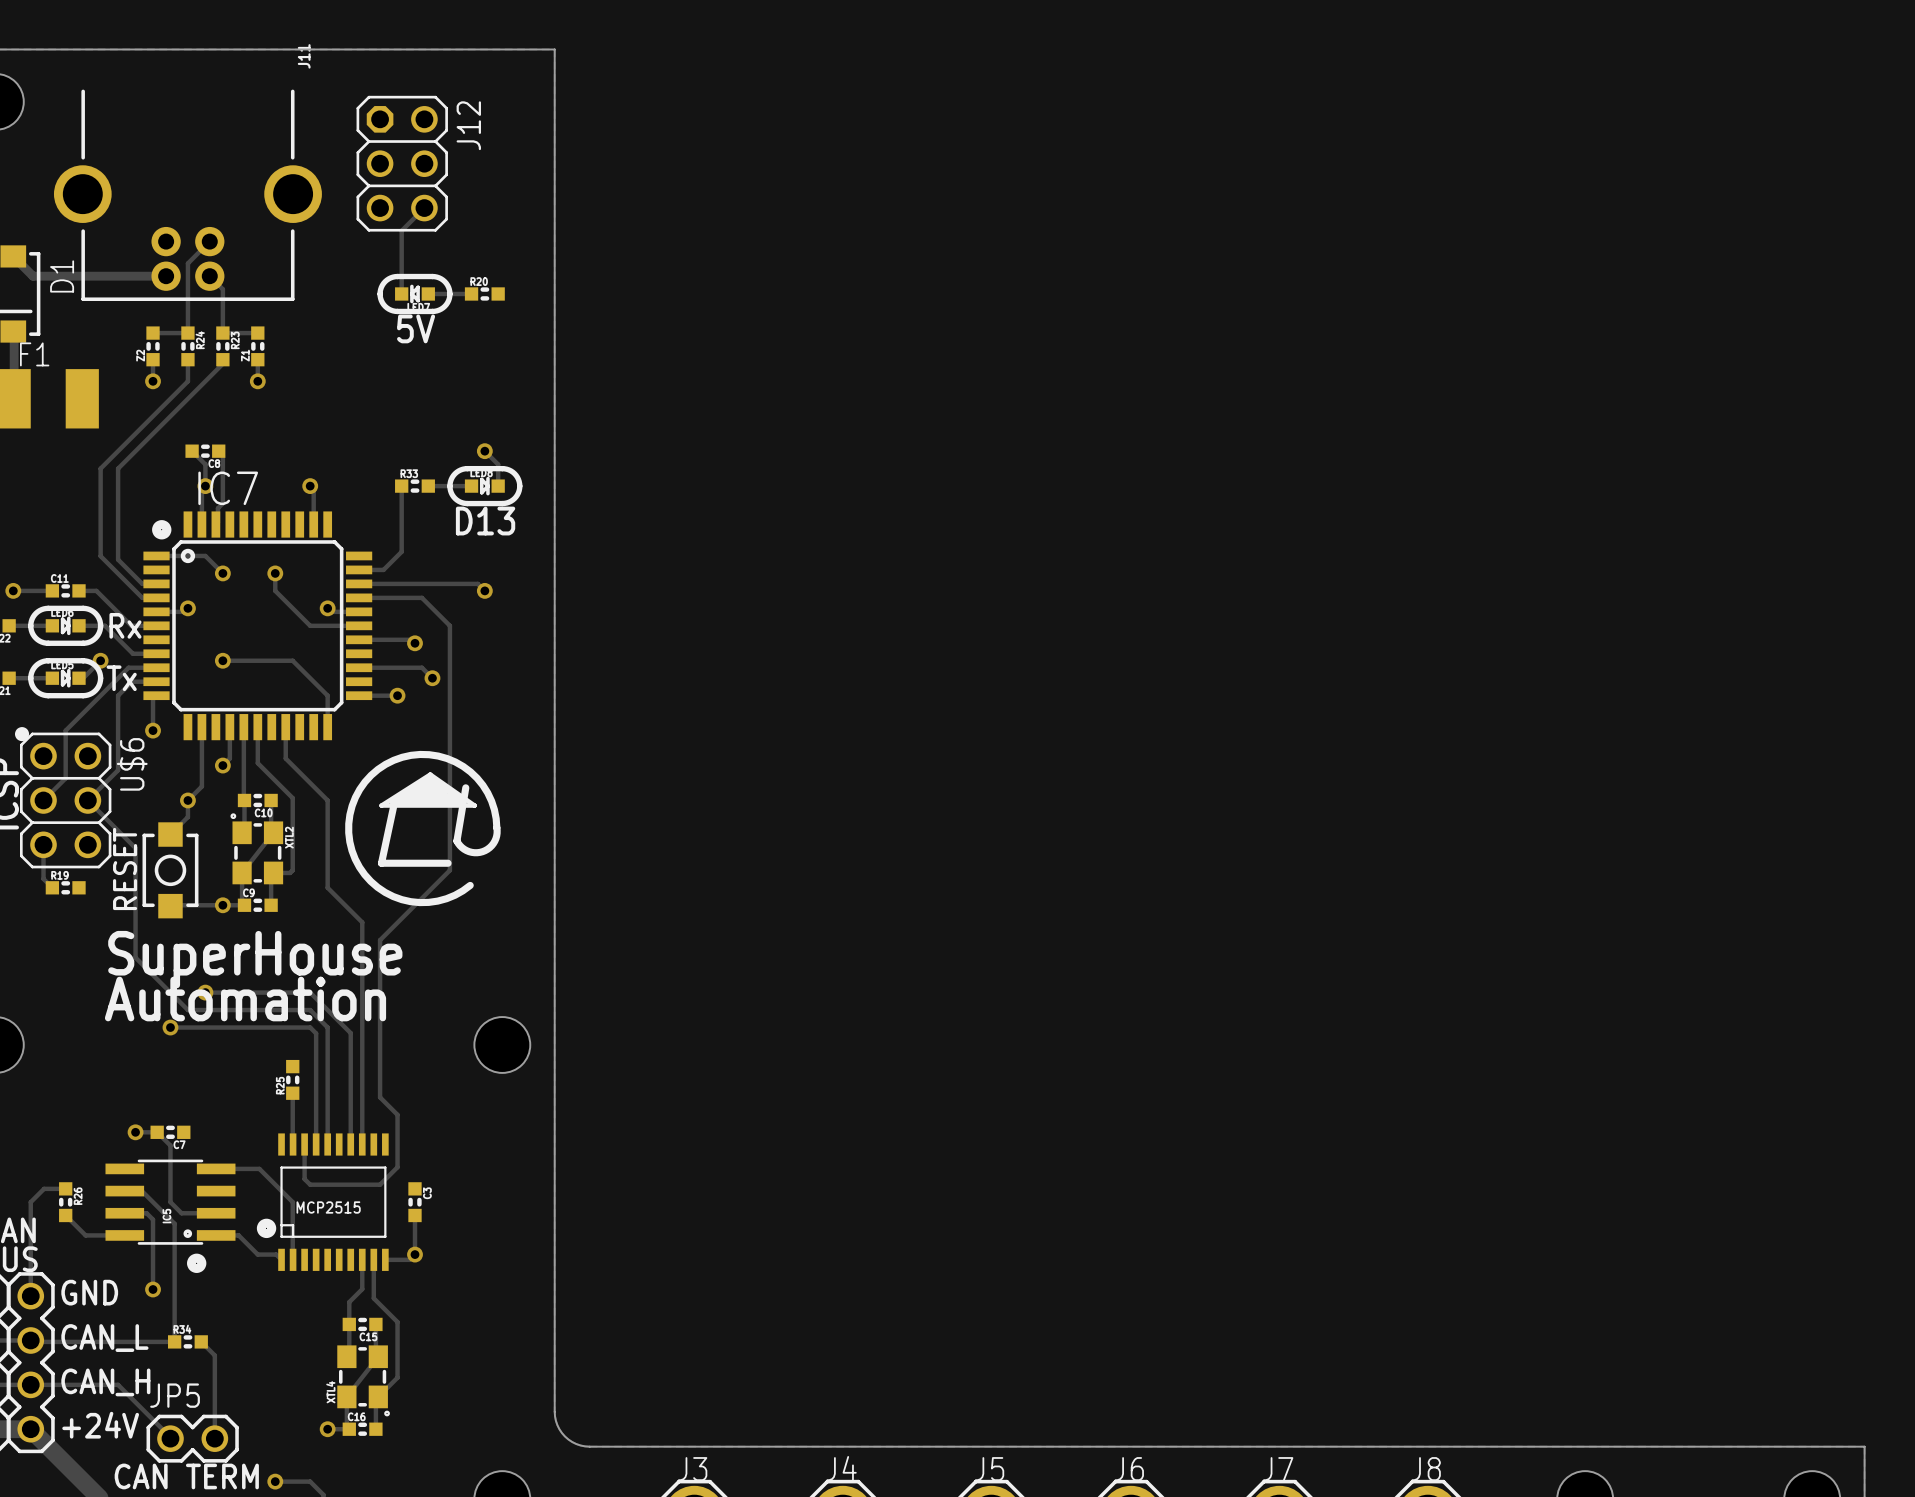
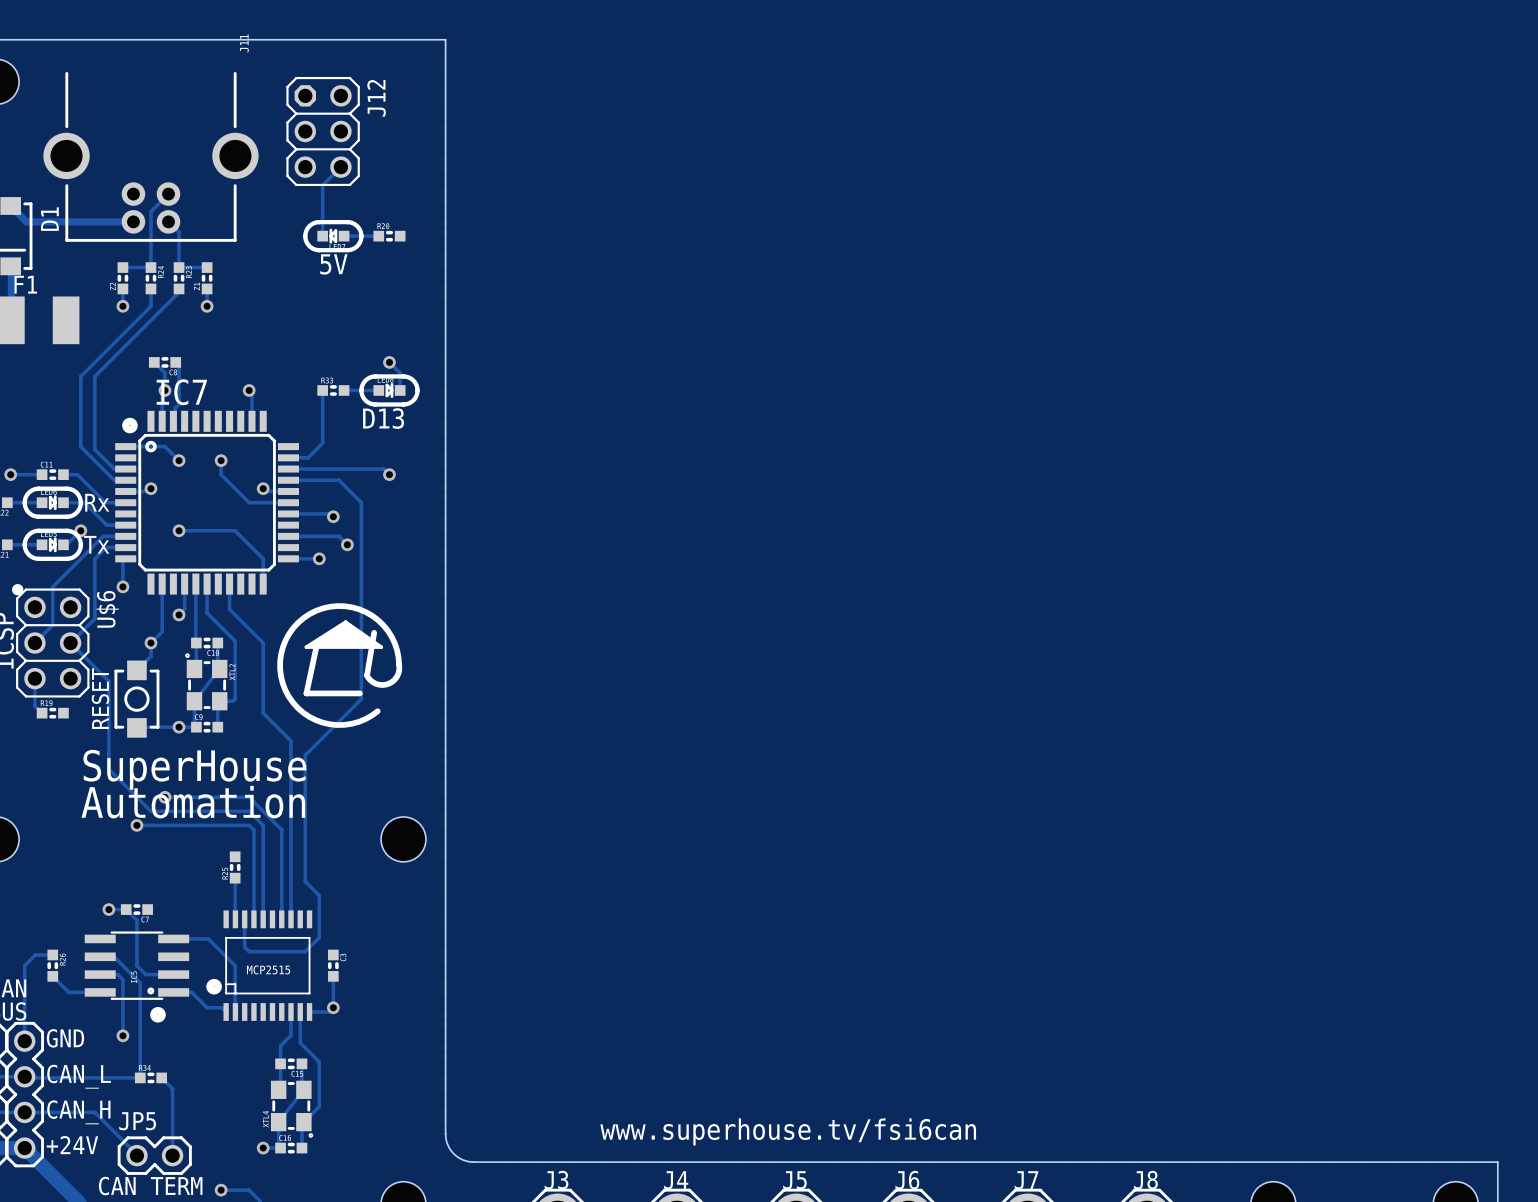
text: none -> www.superhouse.tv/fsi6can (788, 1131)

